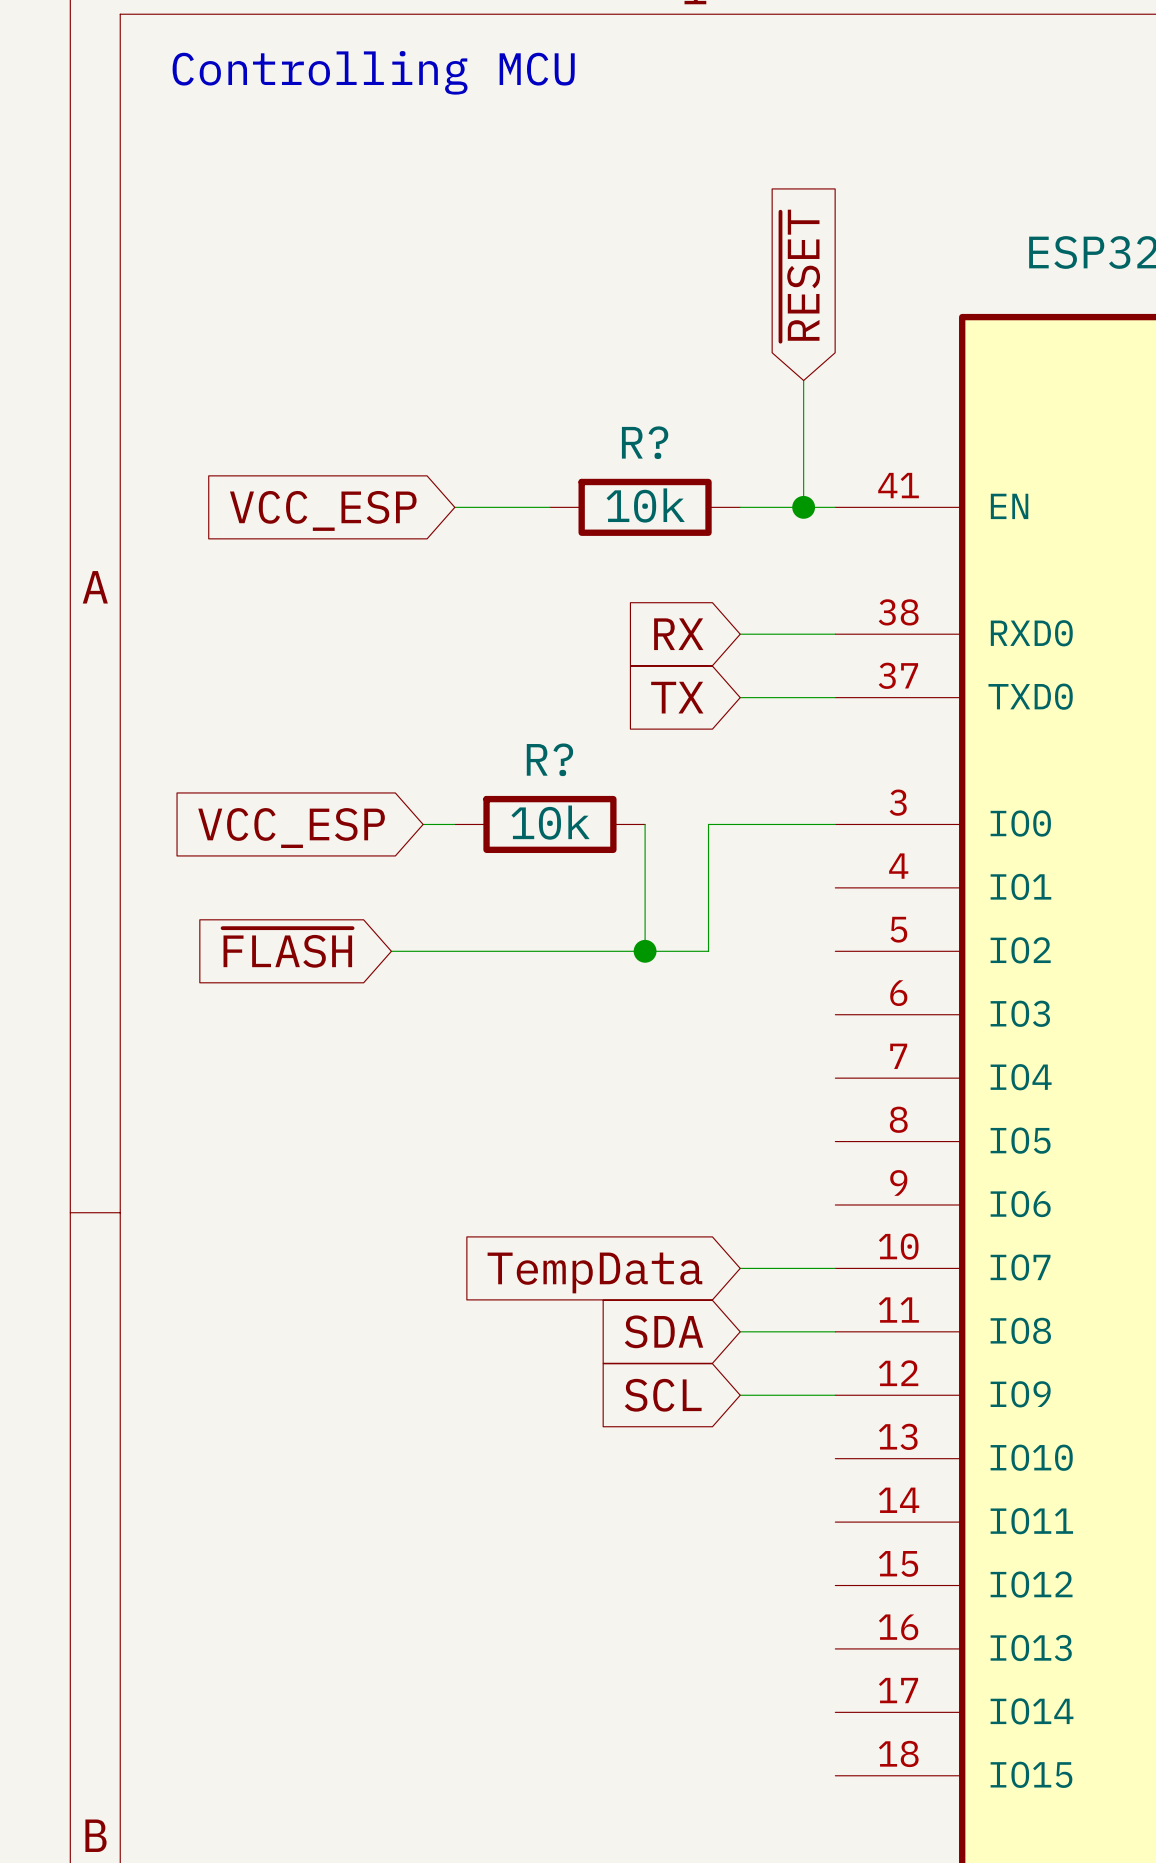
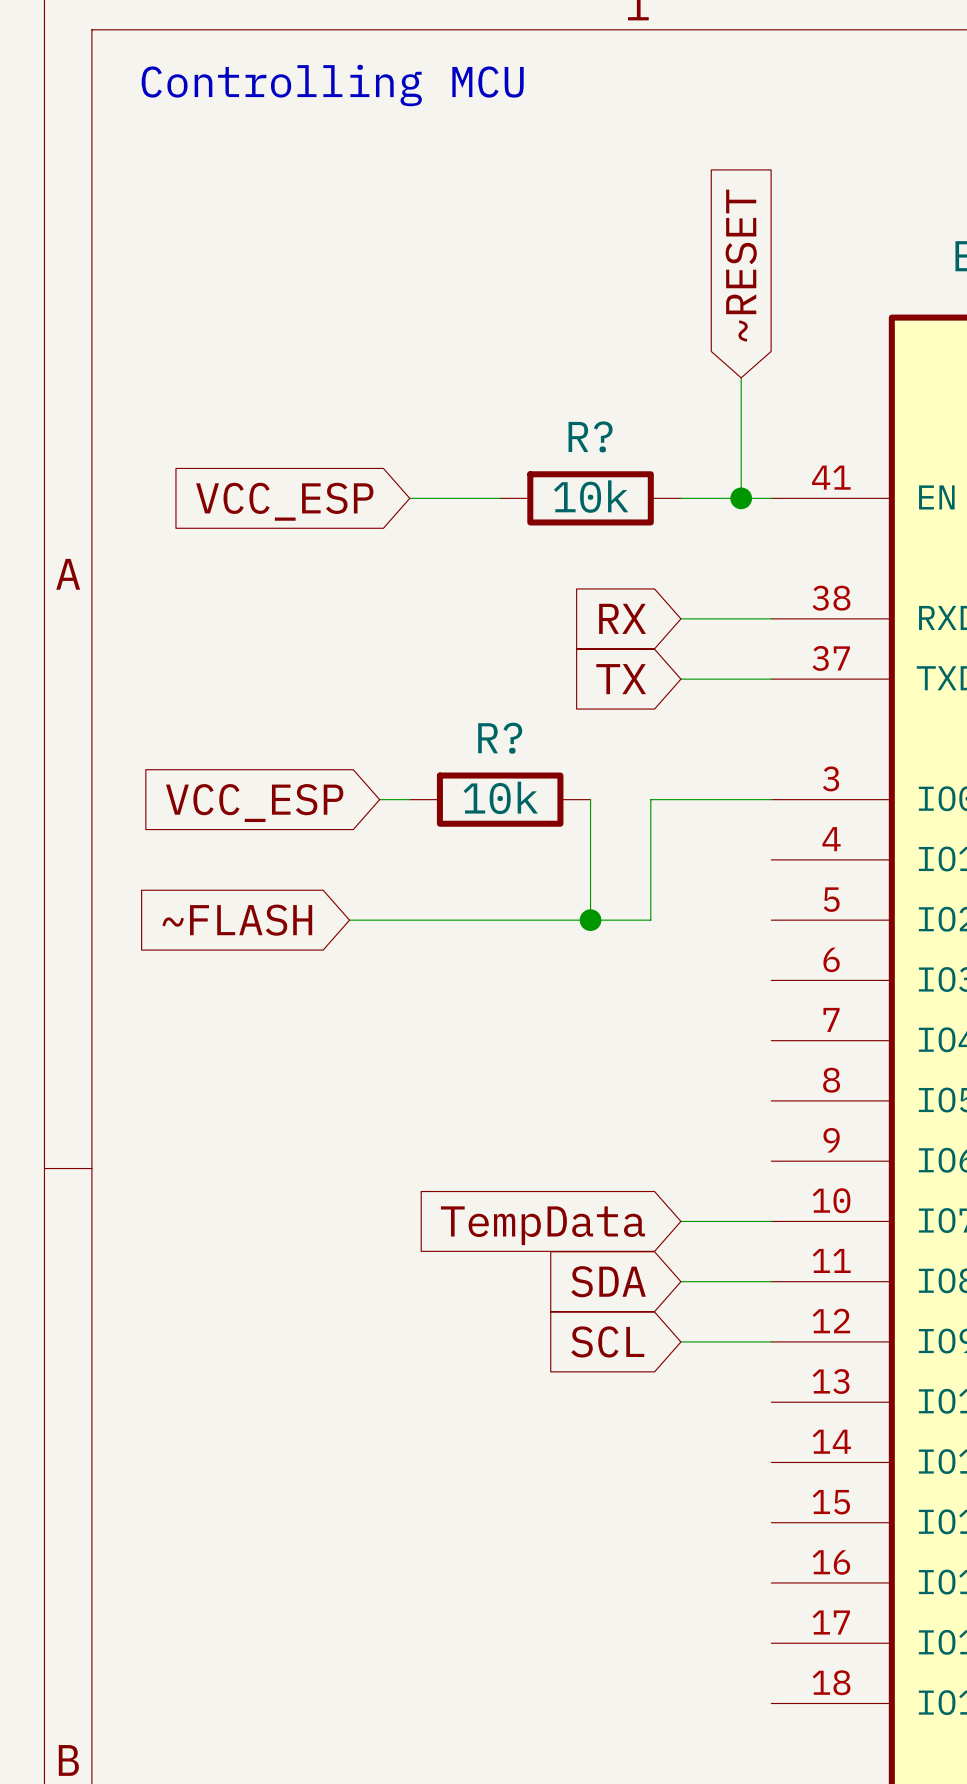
global label: ~{RESET} (800, 275) -> ~RESET (741, 265)
global label: ~{FLASH} (287, 947) -> ~FLASH (237, 920)

